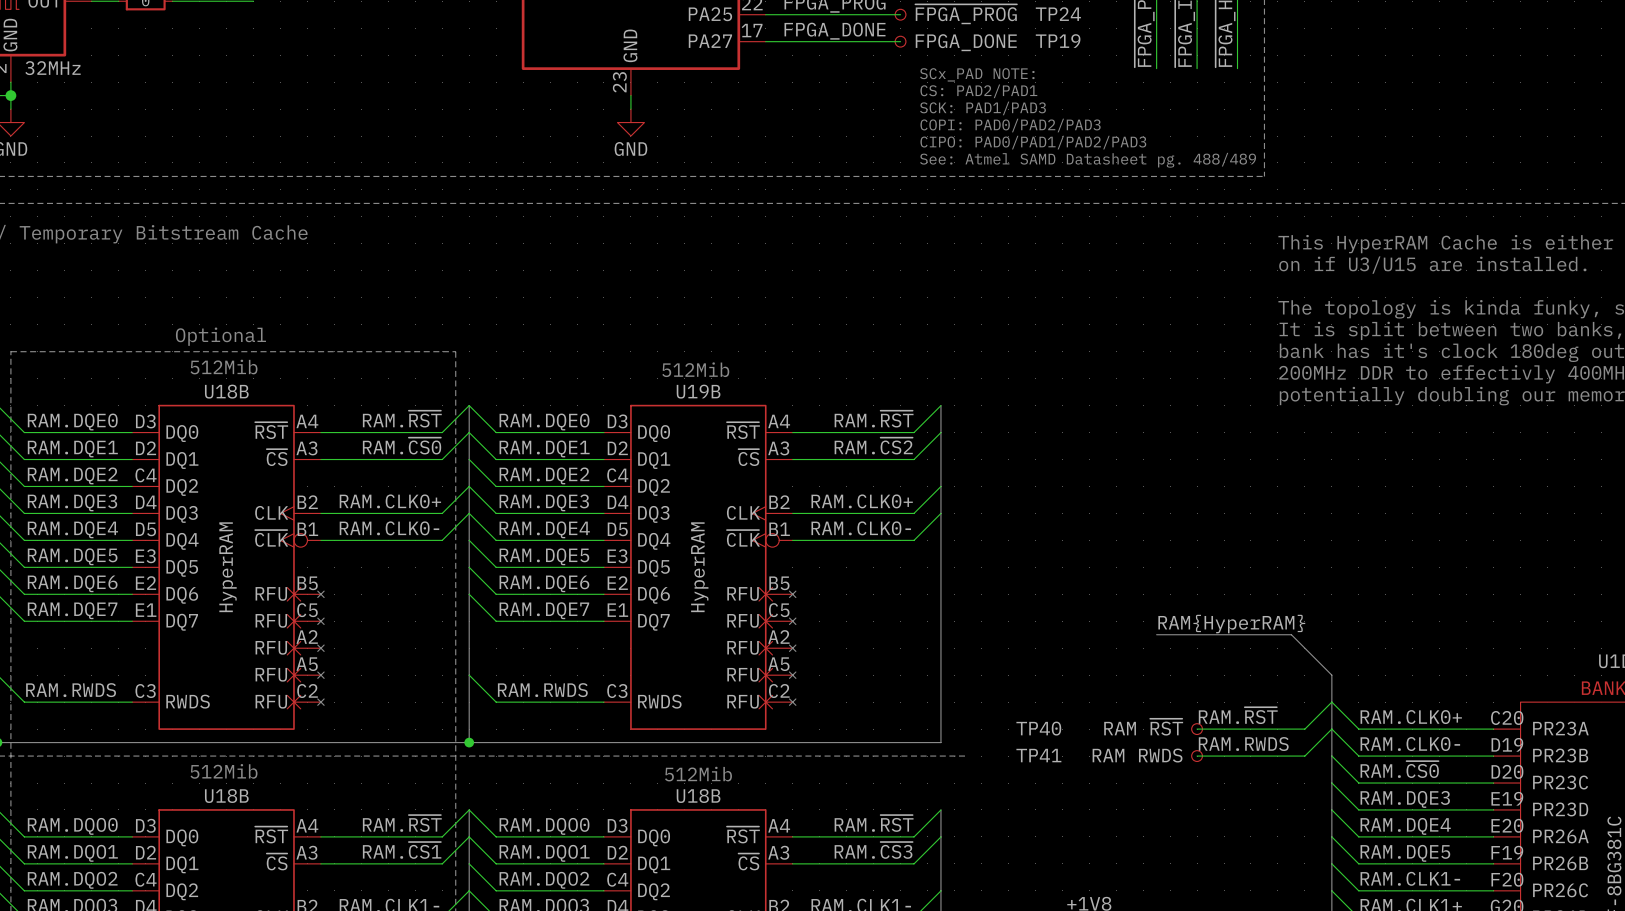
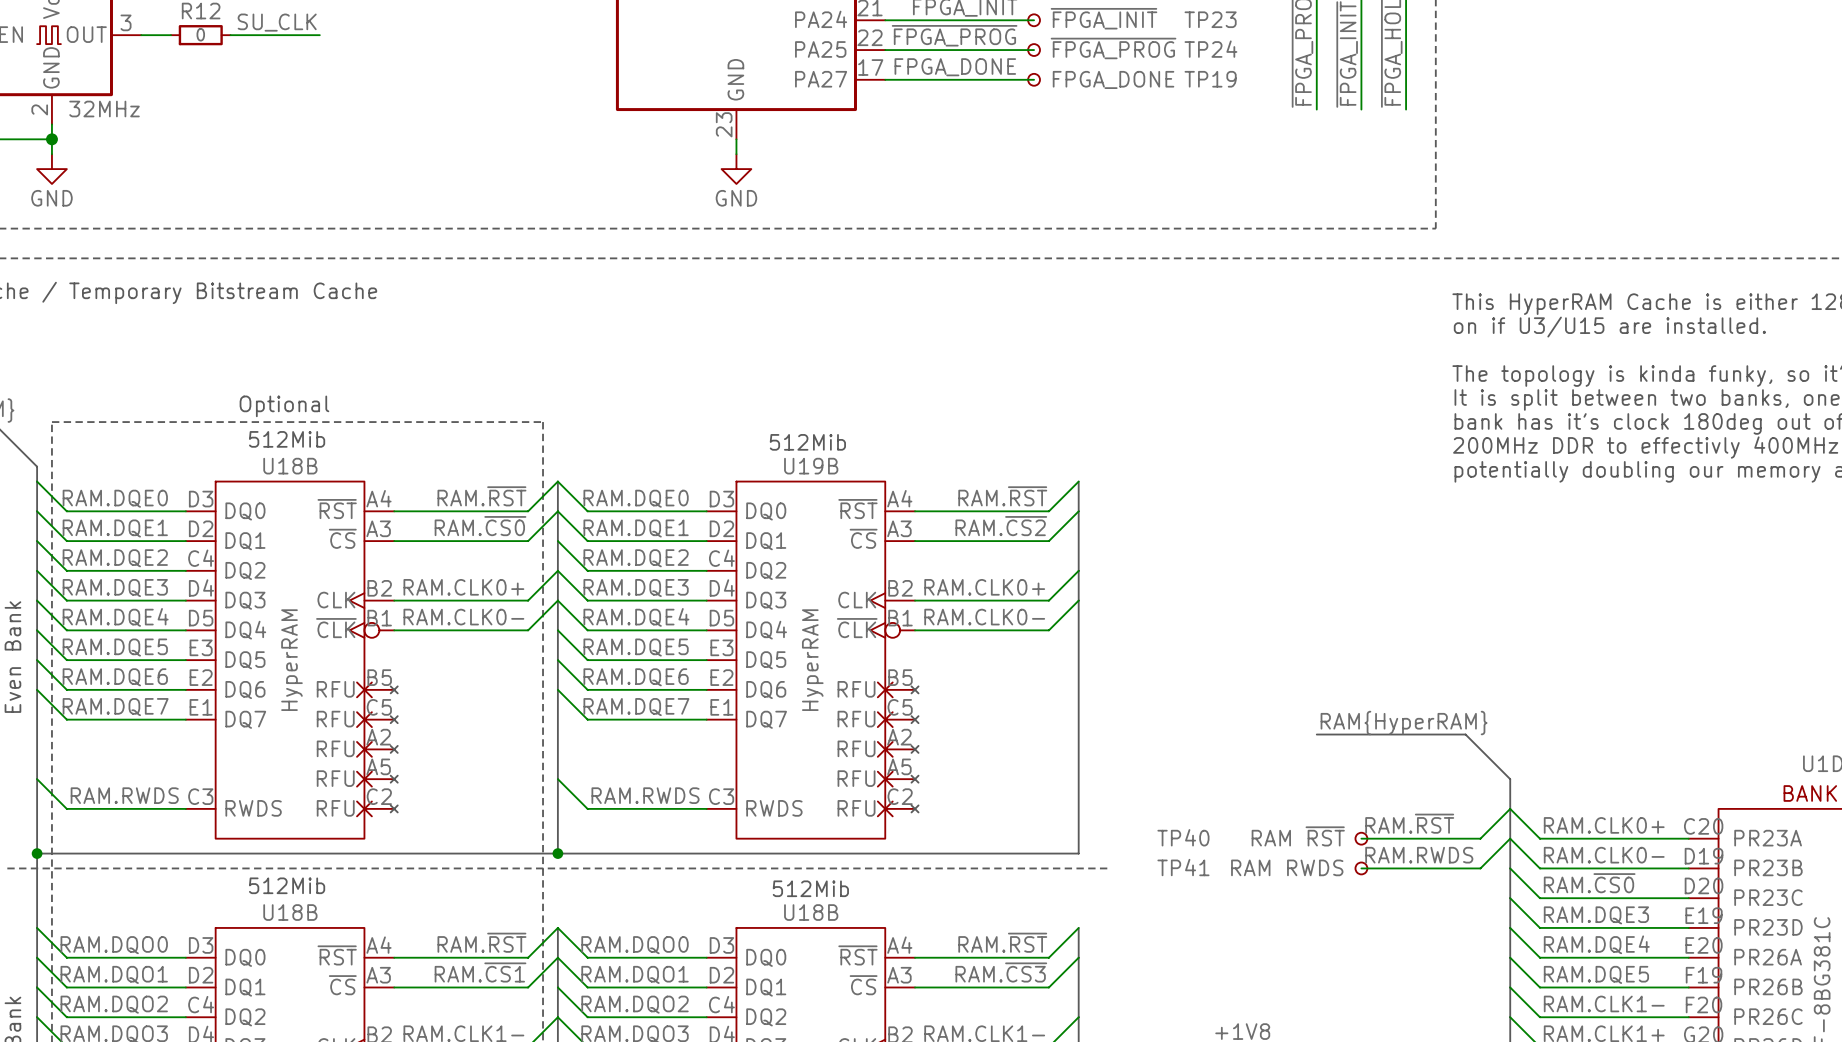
text: SCx_PAD NOTE: (977, 74) -> none
text: CS: PAD2/PAD1 (978, 91) -> none
text: SCK: PAD1/PAD3 (982, 108) -> none
text: COPI: PAD0/PAD2/PAD3 (1010, 125) -> none
text: CIPO: PAD0/PAD1/PAD2/PAD3 (1033, 142) -> none
text: See: Atmel SAMD Datasheet pg. 488/489 (1088, 160) -> none

